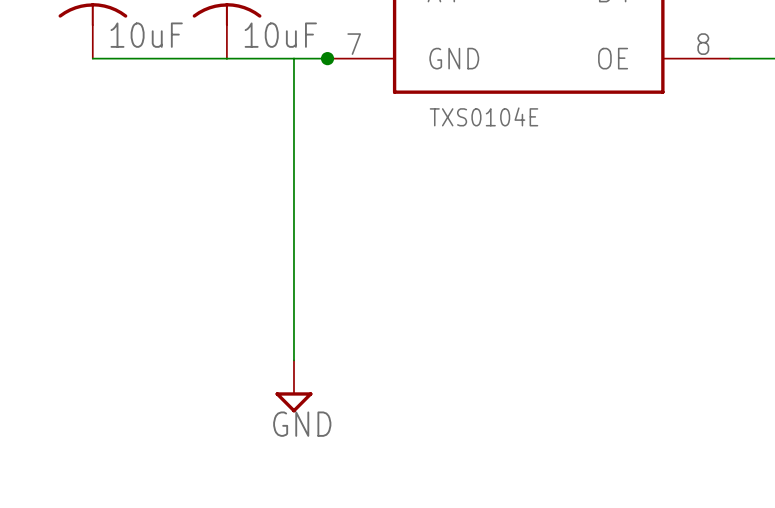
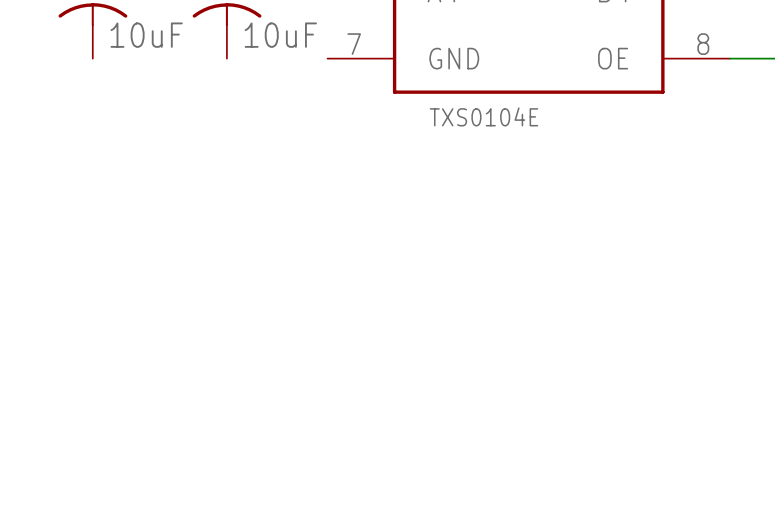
wire: (92, 58) (327, 58) -> none
wire: (293, 58) (293, 360) -> none
junction: (327, 58) -> none
power symbol: GND (293, 386) -> none

